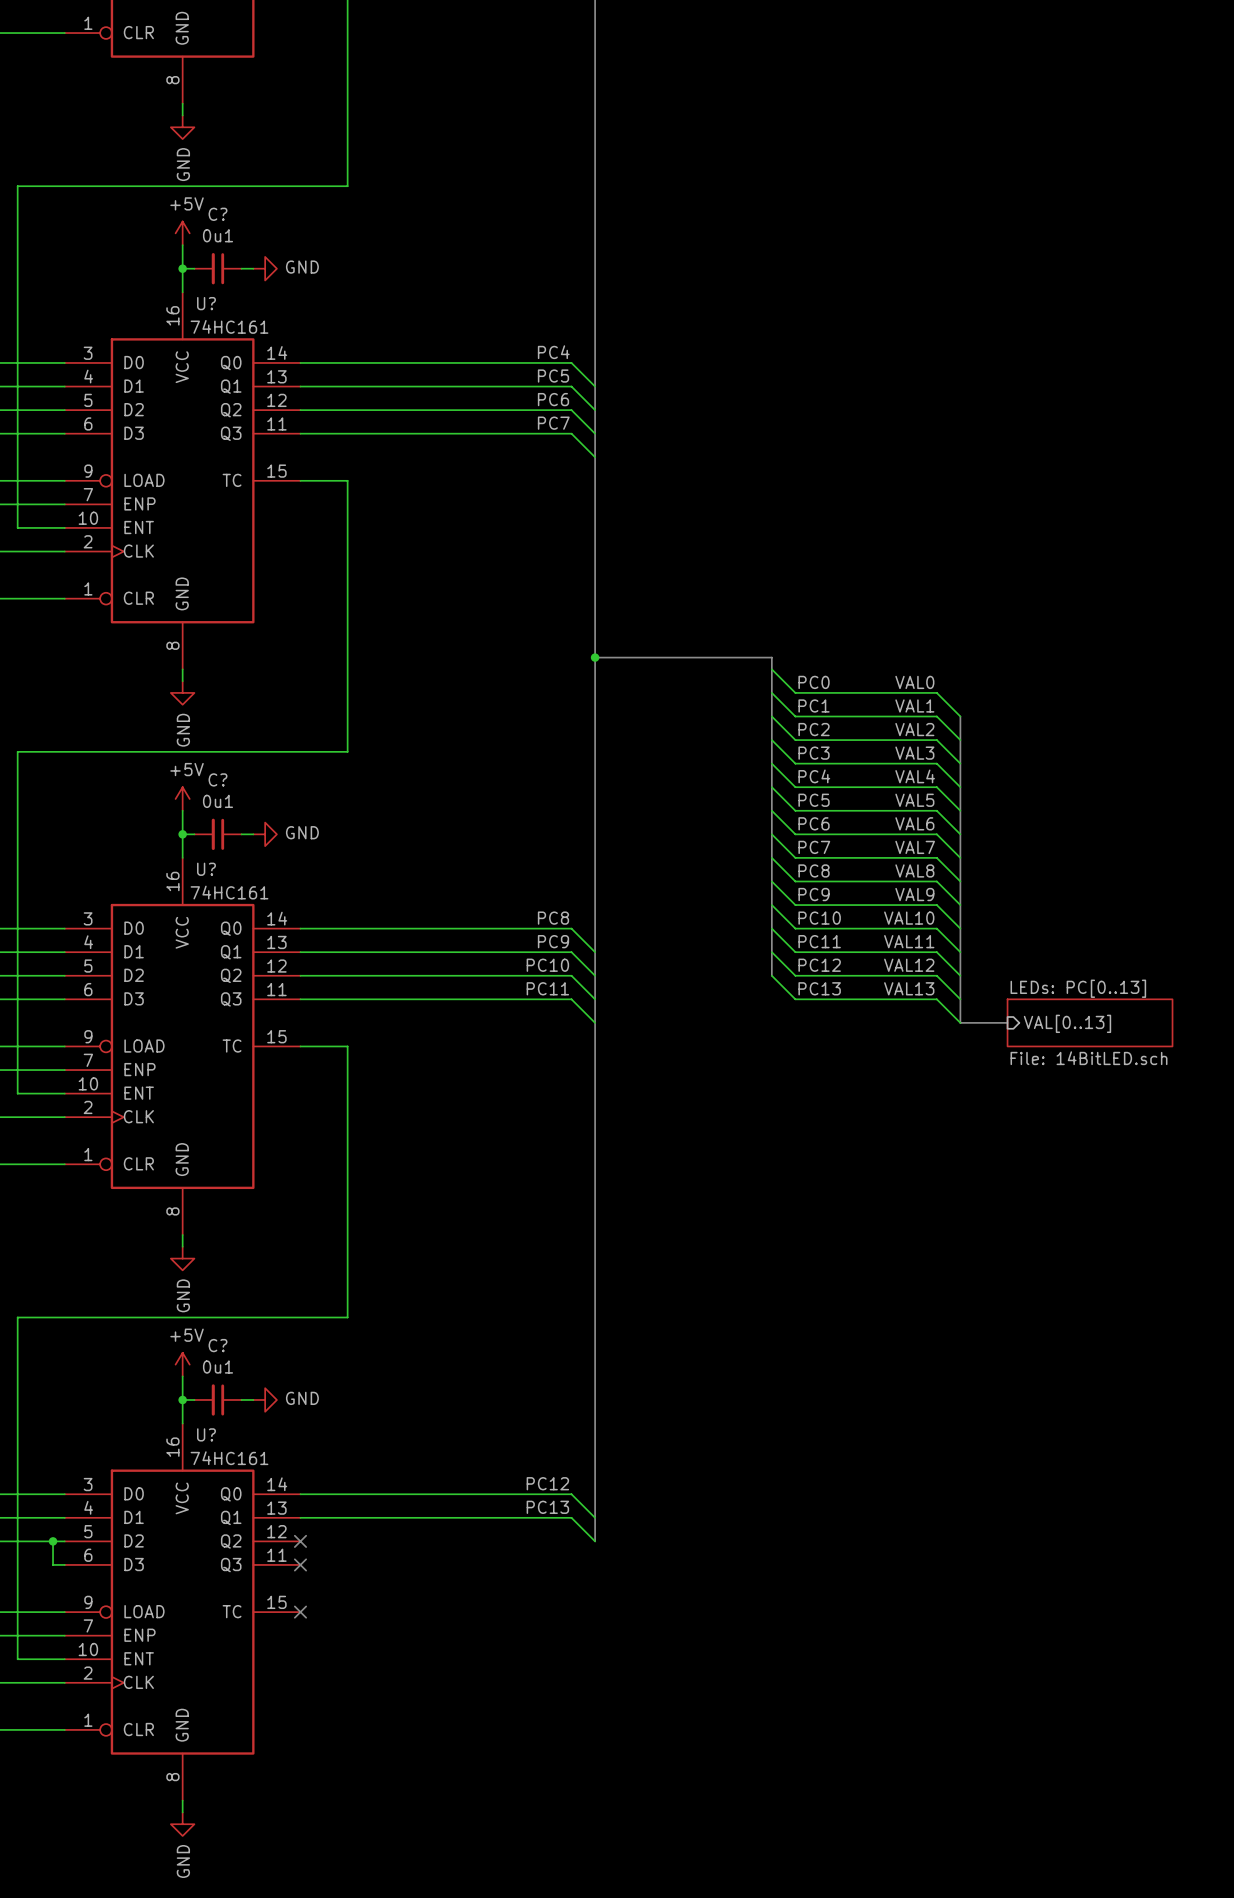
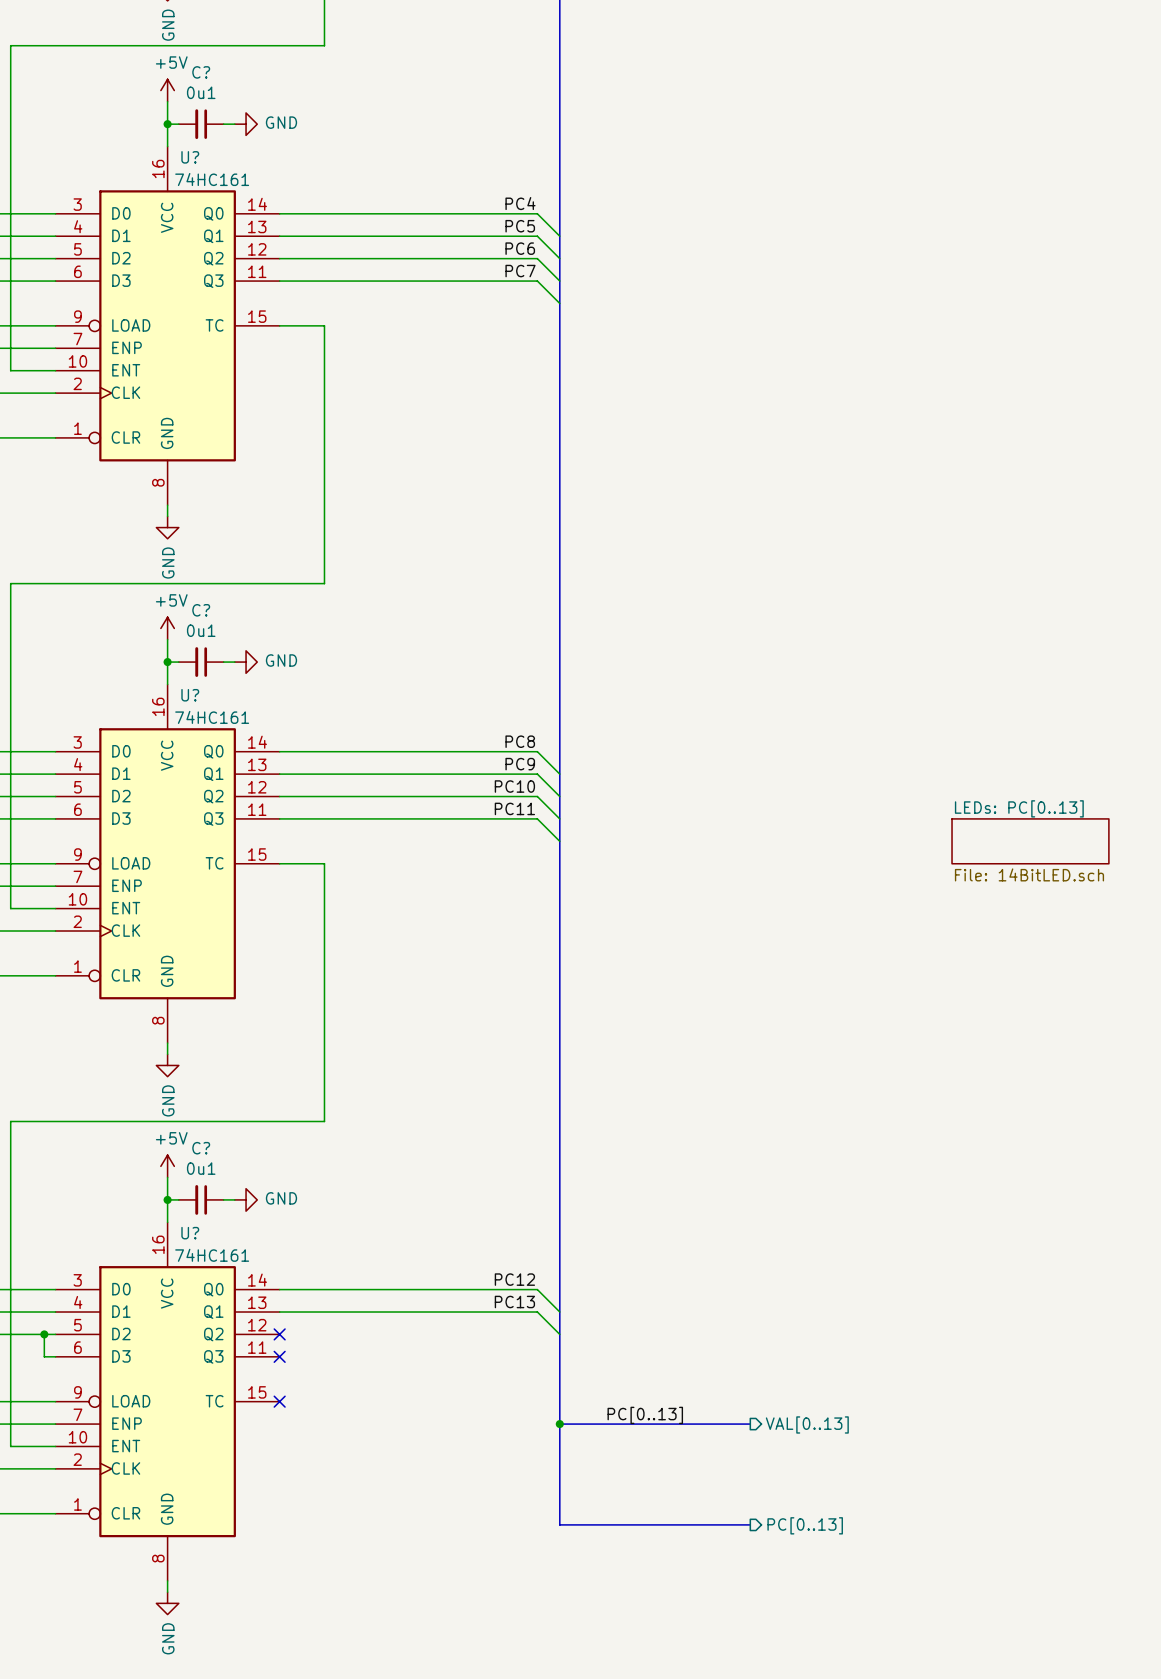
bus: (595, 657) (771, 657) (771, 975) -> none
junction: (595, 657) -> none
wire: (771, 669) (795, 692) (936, 692) (960, 716) -> none
label: PC0 (814, 682) -> none
label: VAL0 (914, 682) -> none
wire: (771, 692) (795, 716) (936, 716) (960, 740) -> none
label: PC1 (814, 705) -> none
label: VAL1 (914, 705) -> none
wire: (771, 716) (795, 740) (936, 740) (960, 763) -> none
bus: (960, 716) (960, 1022) (1007, 1022) -> none
label: PC2 (814, 729) -> none
label: VAL2 (914, 729) -> none
wire: (771, 740) (795, 763) (936, 763) (960, 787) -> none
label: PC3 (814, 753) -> none
label: VAL3 (914, 753) -> none
wire: (771, 763) (795, 787) (936, 787) (960, 810) -> none
label: PC4 (814, 776) -> none
label: VAL4 (915, 776) -> none
wire: (771, 787) (795, 810) (936, 810) (960, 834) -> none
label: PC5 (814, 800) -> none
label: VAL5 (914, 800) -> none
wire: (771, 810) (795, 834) (936, 834) (960, 857) -> none
label: PC6 (814, 823) -> none
label: VAL6 (914, 823) -> none
wire: (771, 834) (795, 857) (936, 857) (960, 881) -> none
label: PC7 (814, 847) -> none
label: VAL7 (915, 847) -> none
wire: (771, 857) (795, 881) (936, 881) (960, 905) -> none
label: PC8 (814, 870) -> none
label: VAL8 (914, 870) -> none
wire: (771, 881) (795, 905) (936, 905) (960, 928) -> none
label: PC9 (814, 894) -> none
label: VAL9 (914, 894) -> none
wire: (771, 905) (795, 928) (936, 928) (960, 952) -> none
label: PC10 (819, 918) -> none
label: VAL10 (909, 918) -> none
wire: (771, 928) (795, 952) (936, 952) (960, 975) -> none
label: PC11 (819, 941) -> none
label: VAL11 (909, 941) -> none
wire: (771, 952) (795, 975) (936, 975) (960, 999) -> none
label: PC12 (819, 965) -> none
label: VAL12 (909, 965) -> none
wire: (771, 975) (795, 999) (936, 999) (960, 1022) -> none
label: PC13 (819, 988) -> none
label: VAL13 (909, 988) -> none
sheet pin: VAL[0..13] (1067, 1023) -> none
bus: none -> (559, 1334) (559, 1524) (750, 1524)
label: none -> PC[0..13] (645, 1415)
bus: none -> (559, 1424) (750, 1424)
junction: none -> (559, 1424)
sheet pin: none -> VAL[0..13] (807, 1424)
sheet pin: none -> PC[0..13] (805, 1525)

